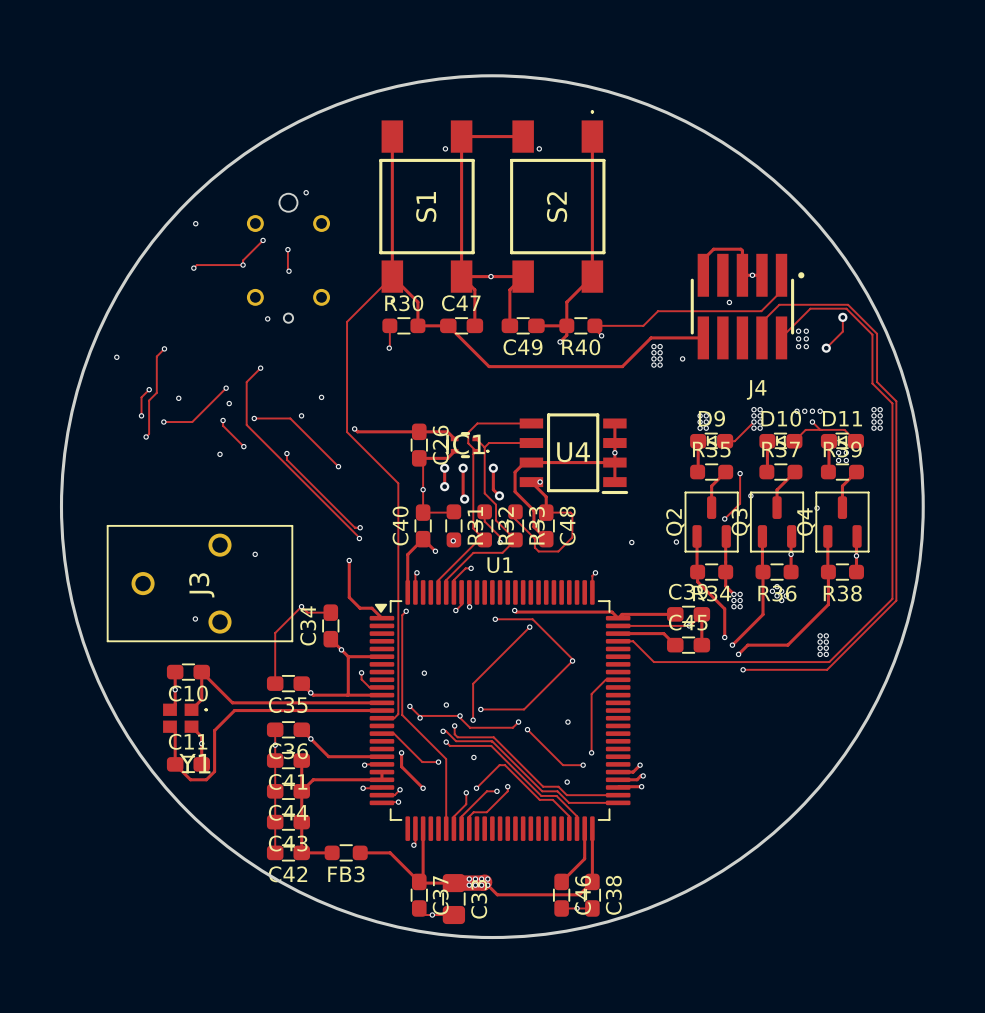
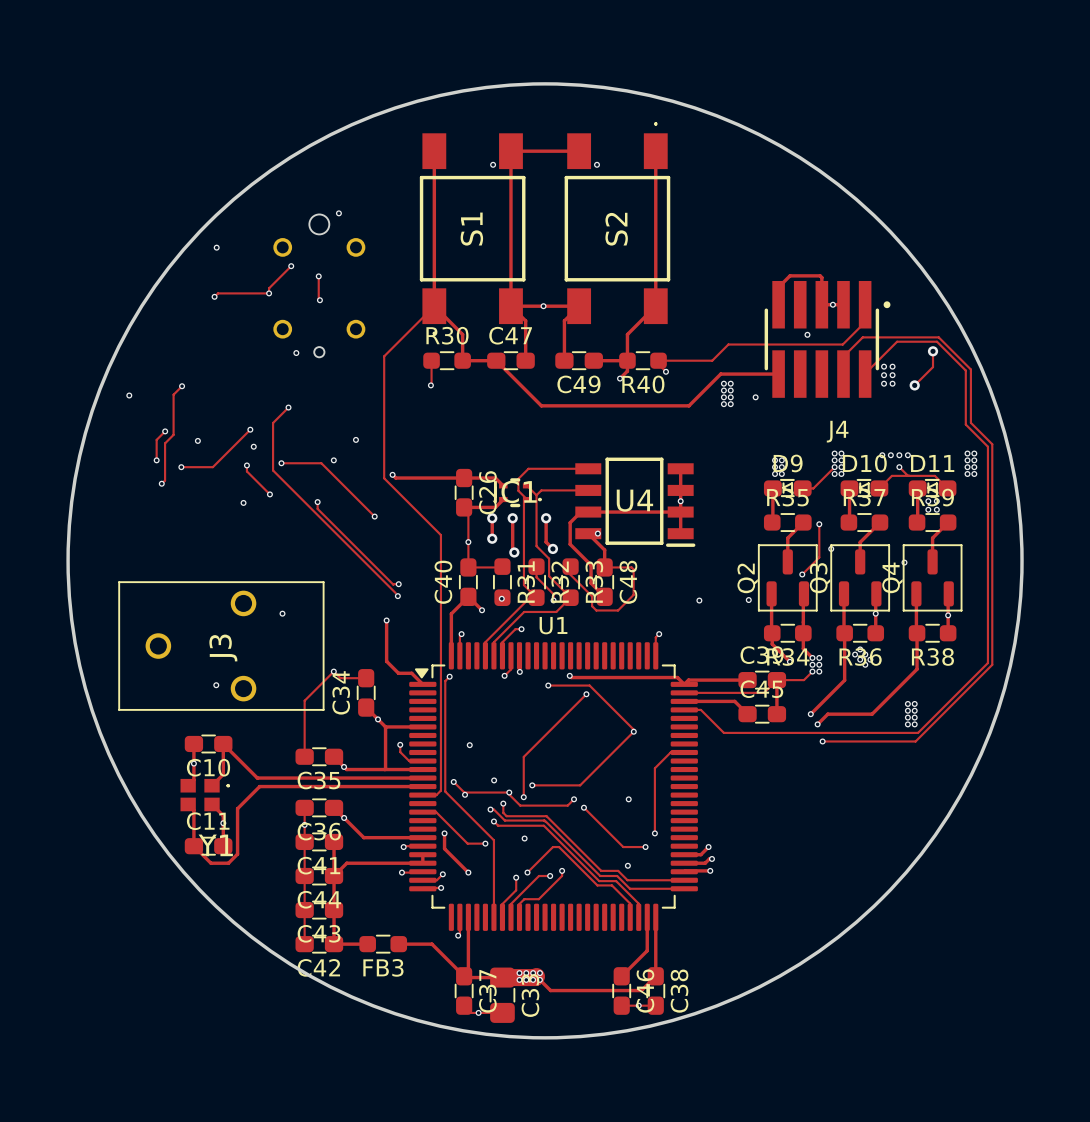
track: (713, 597) (724, 608) (724, 637) -> none
via: none -> (789, 661)
track: none -> (812, 671) (803, 680) (776, 680)
via: (689, 625) -> none
via: (724, 637) -> none

